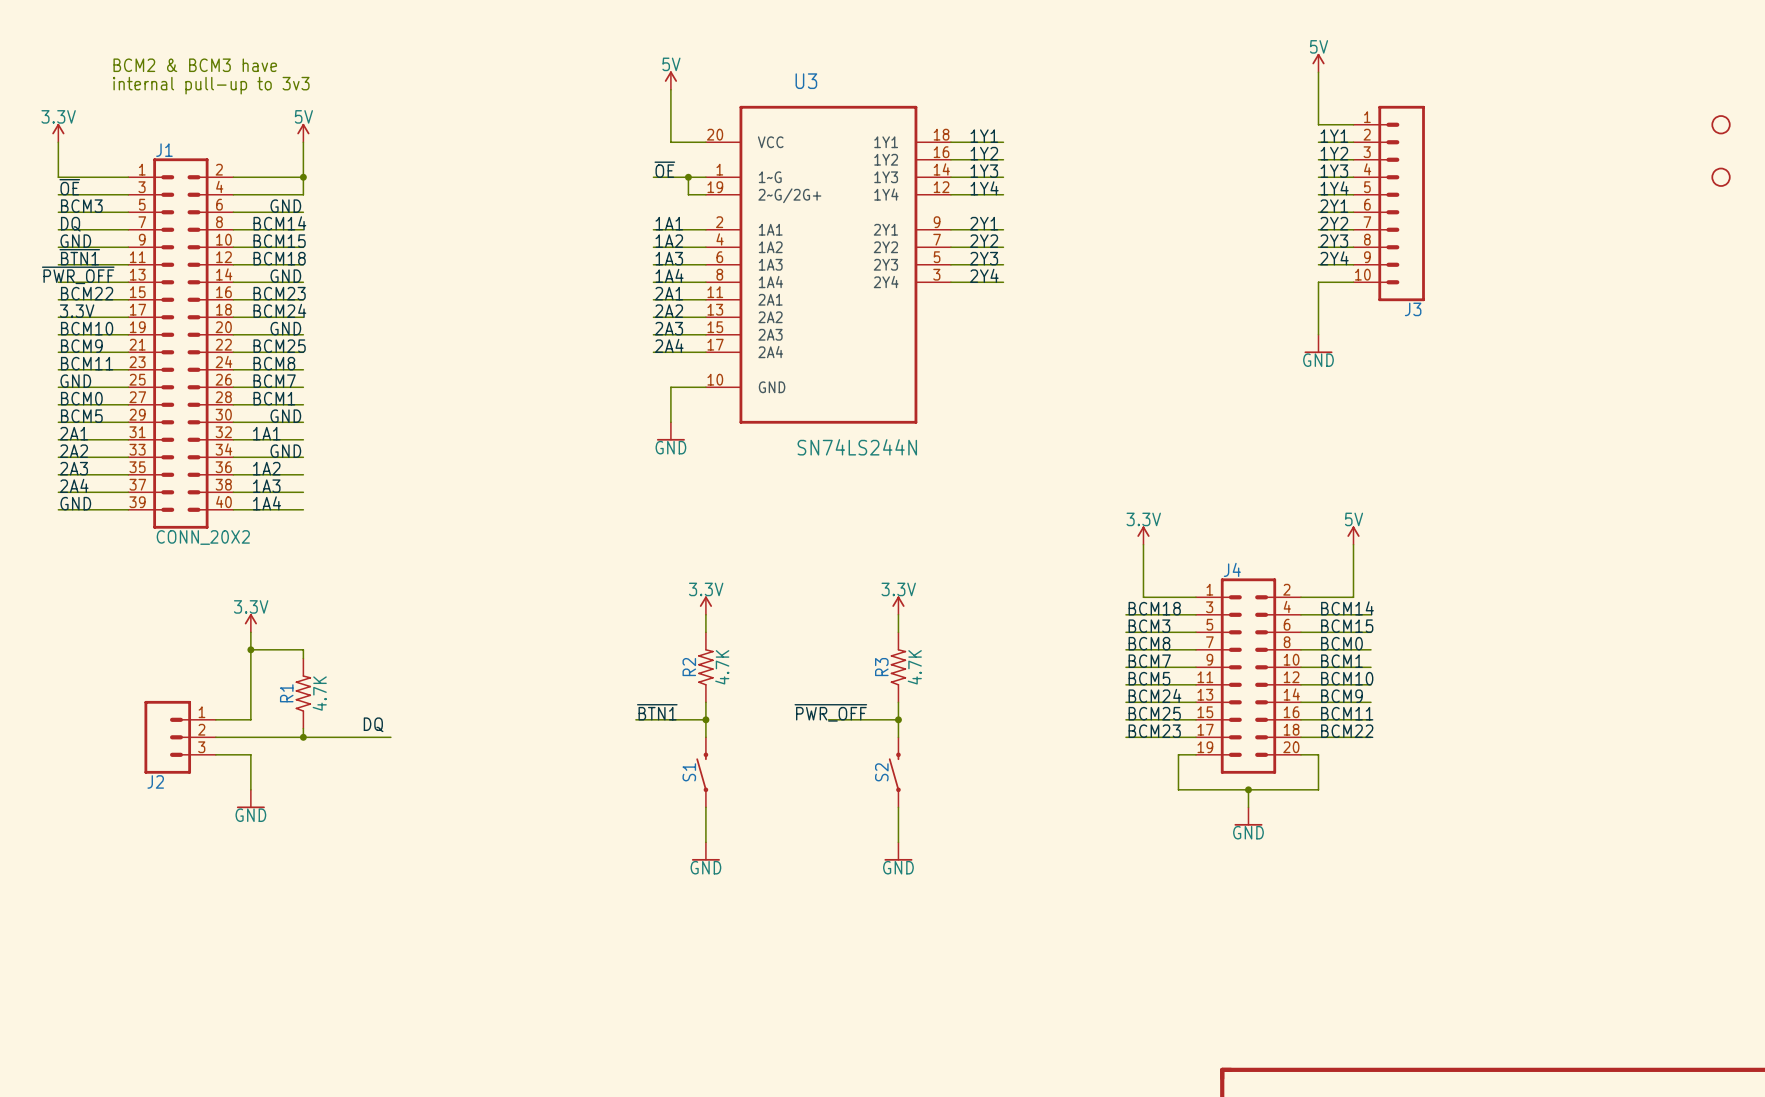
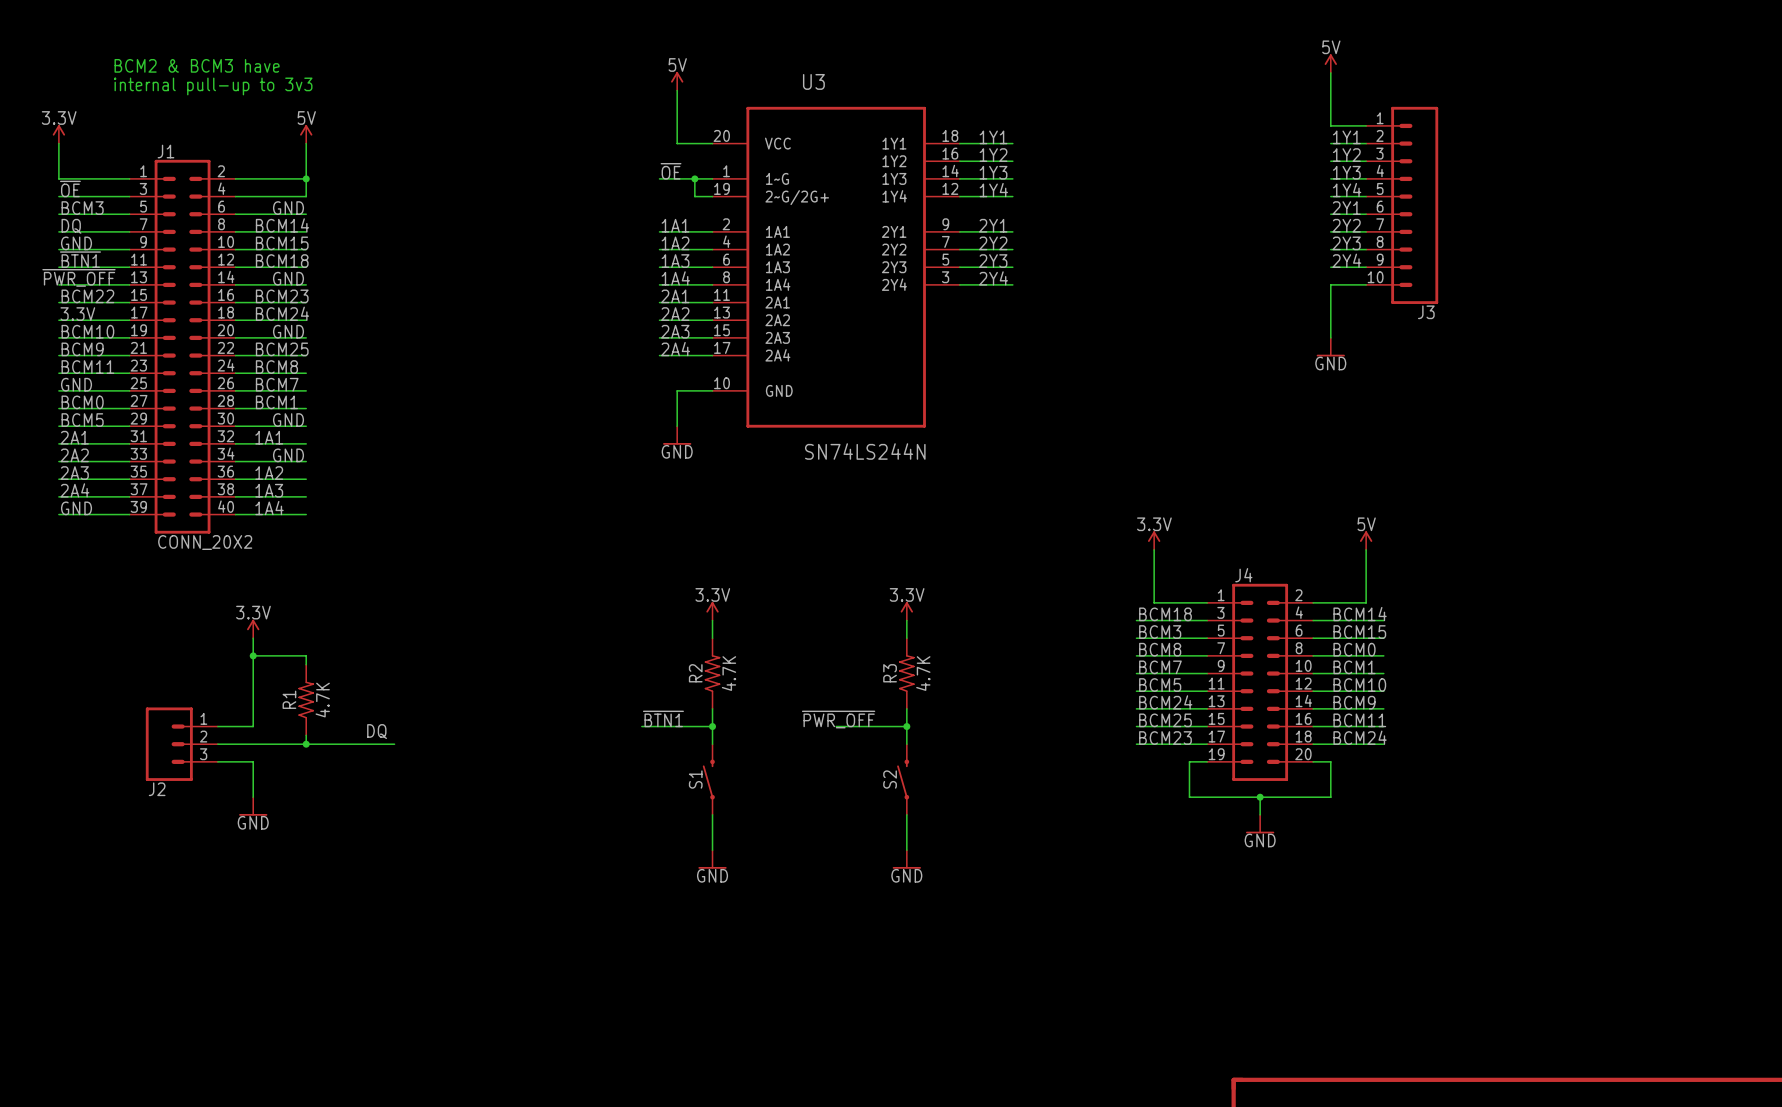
part: (1721, 124) -> none
part: (1721, 177) -> none
label: BCM22 (1347, 731) -> BCM24 (1360, 737)

